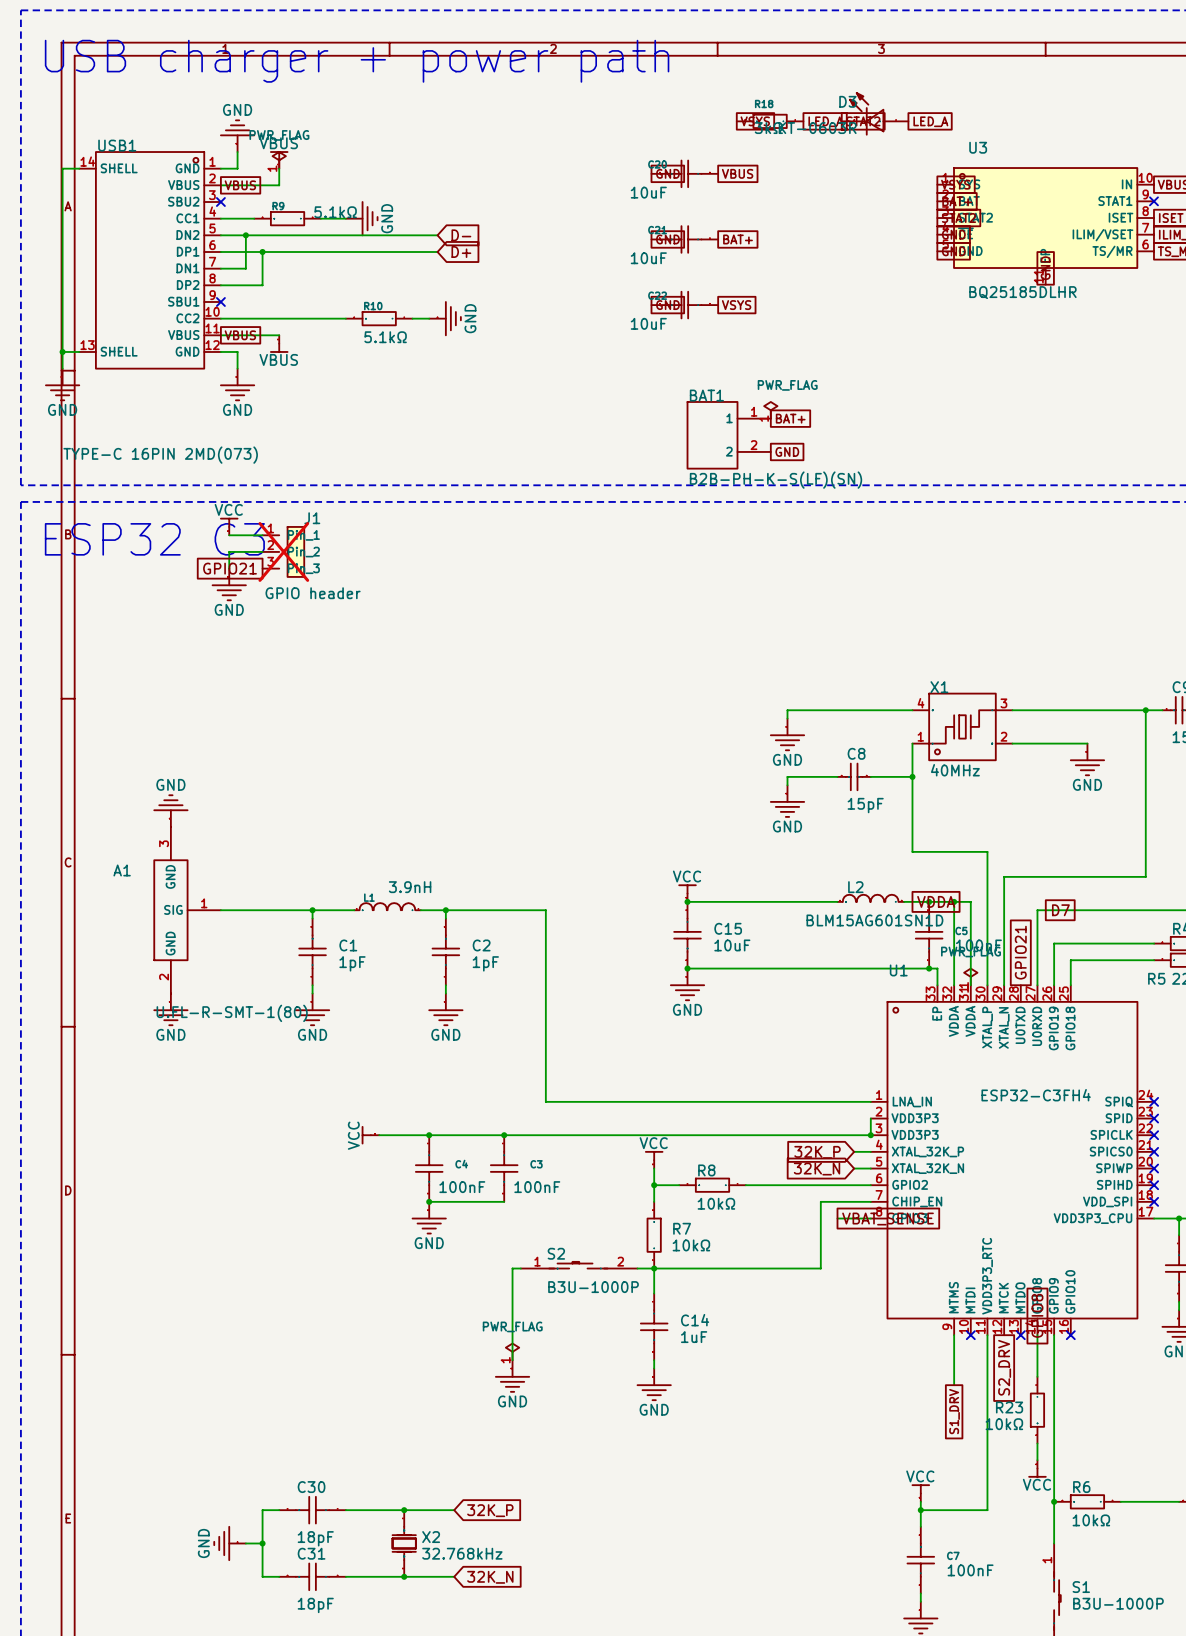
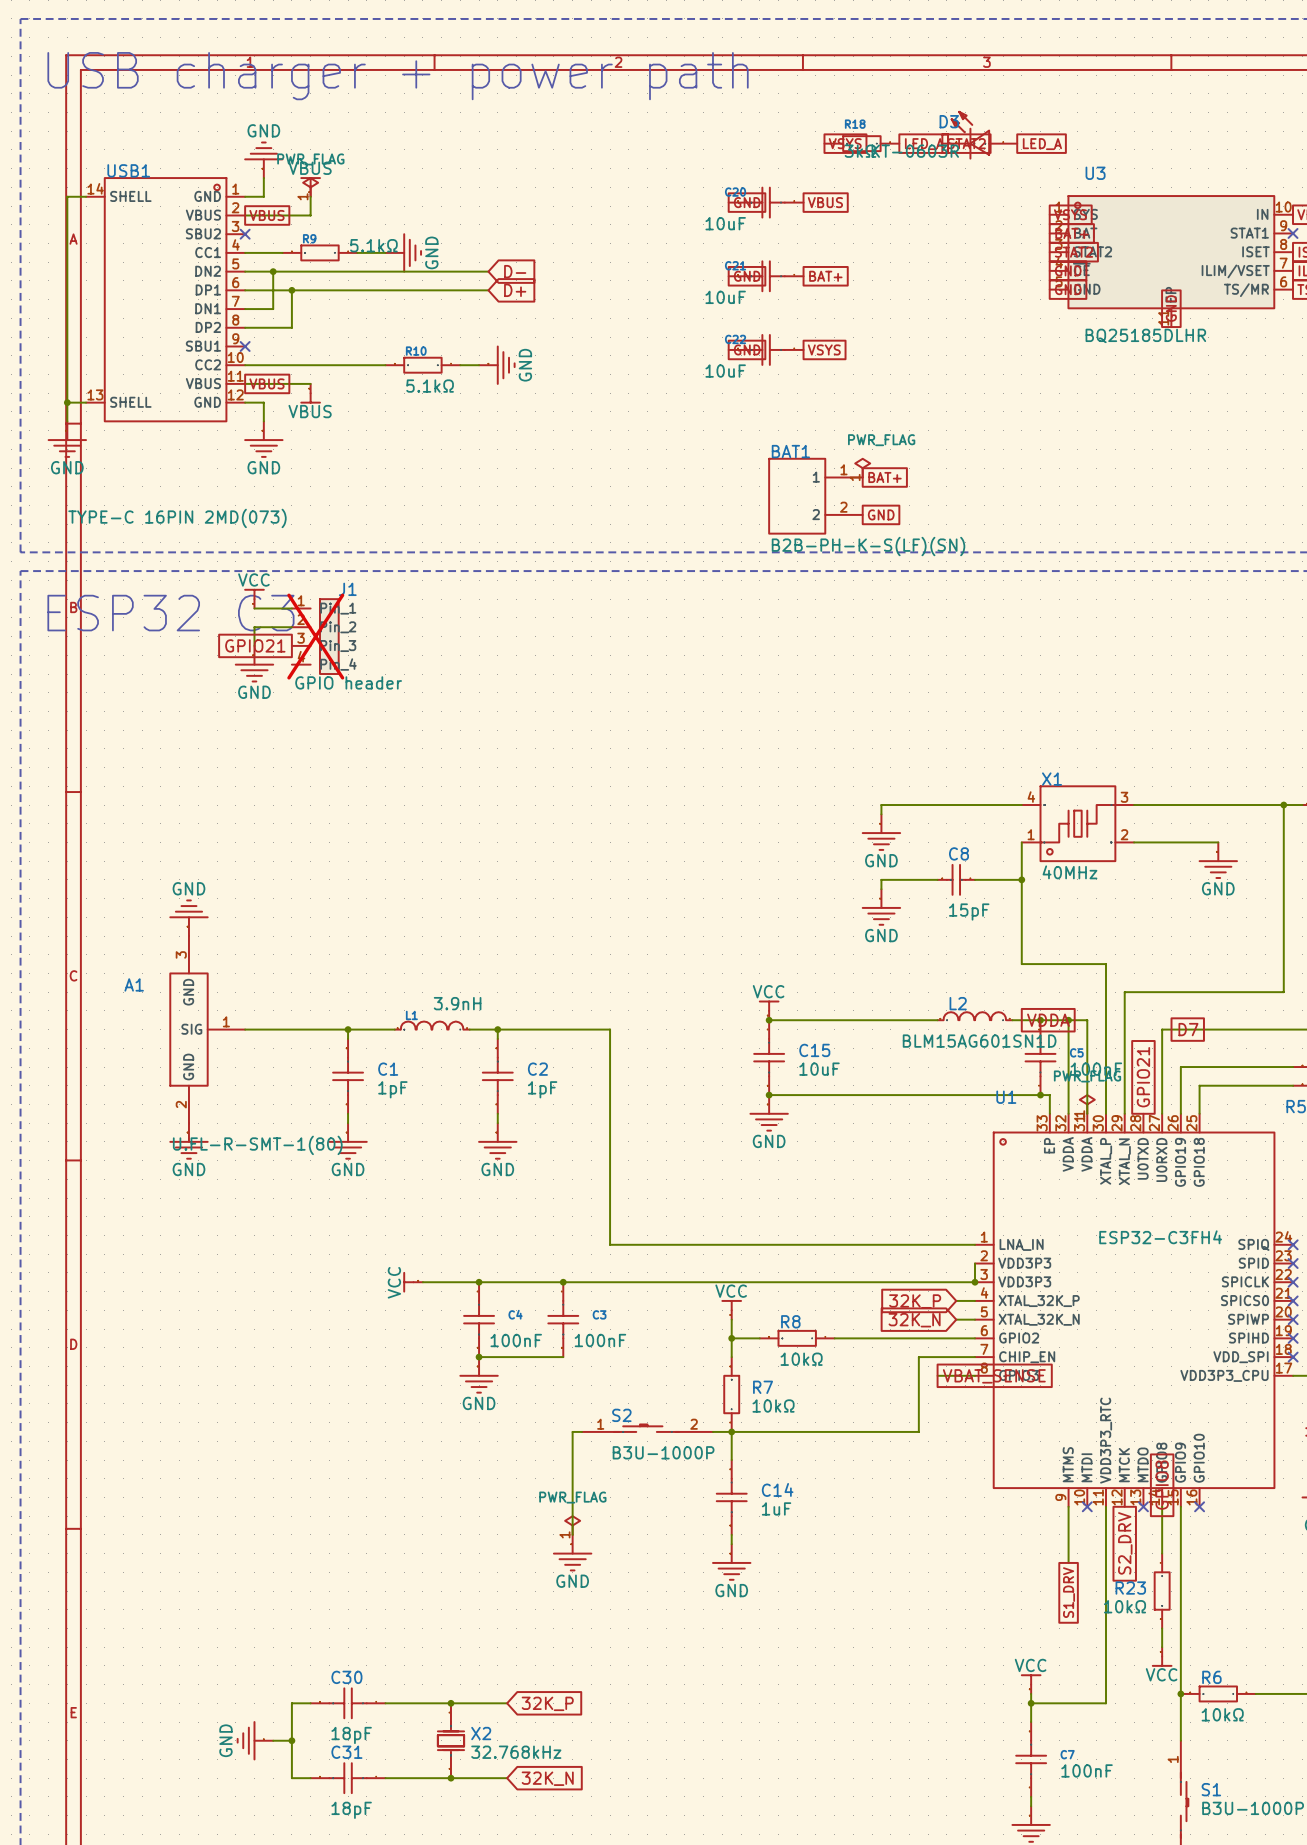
J1 symbol: [262, 526, 306, 578] -> [291, 598, 340, 675]

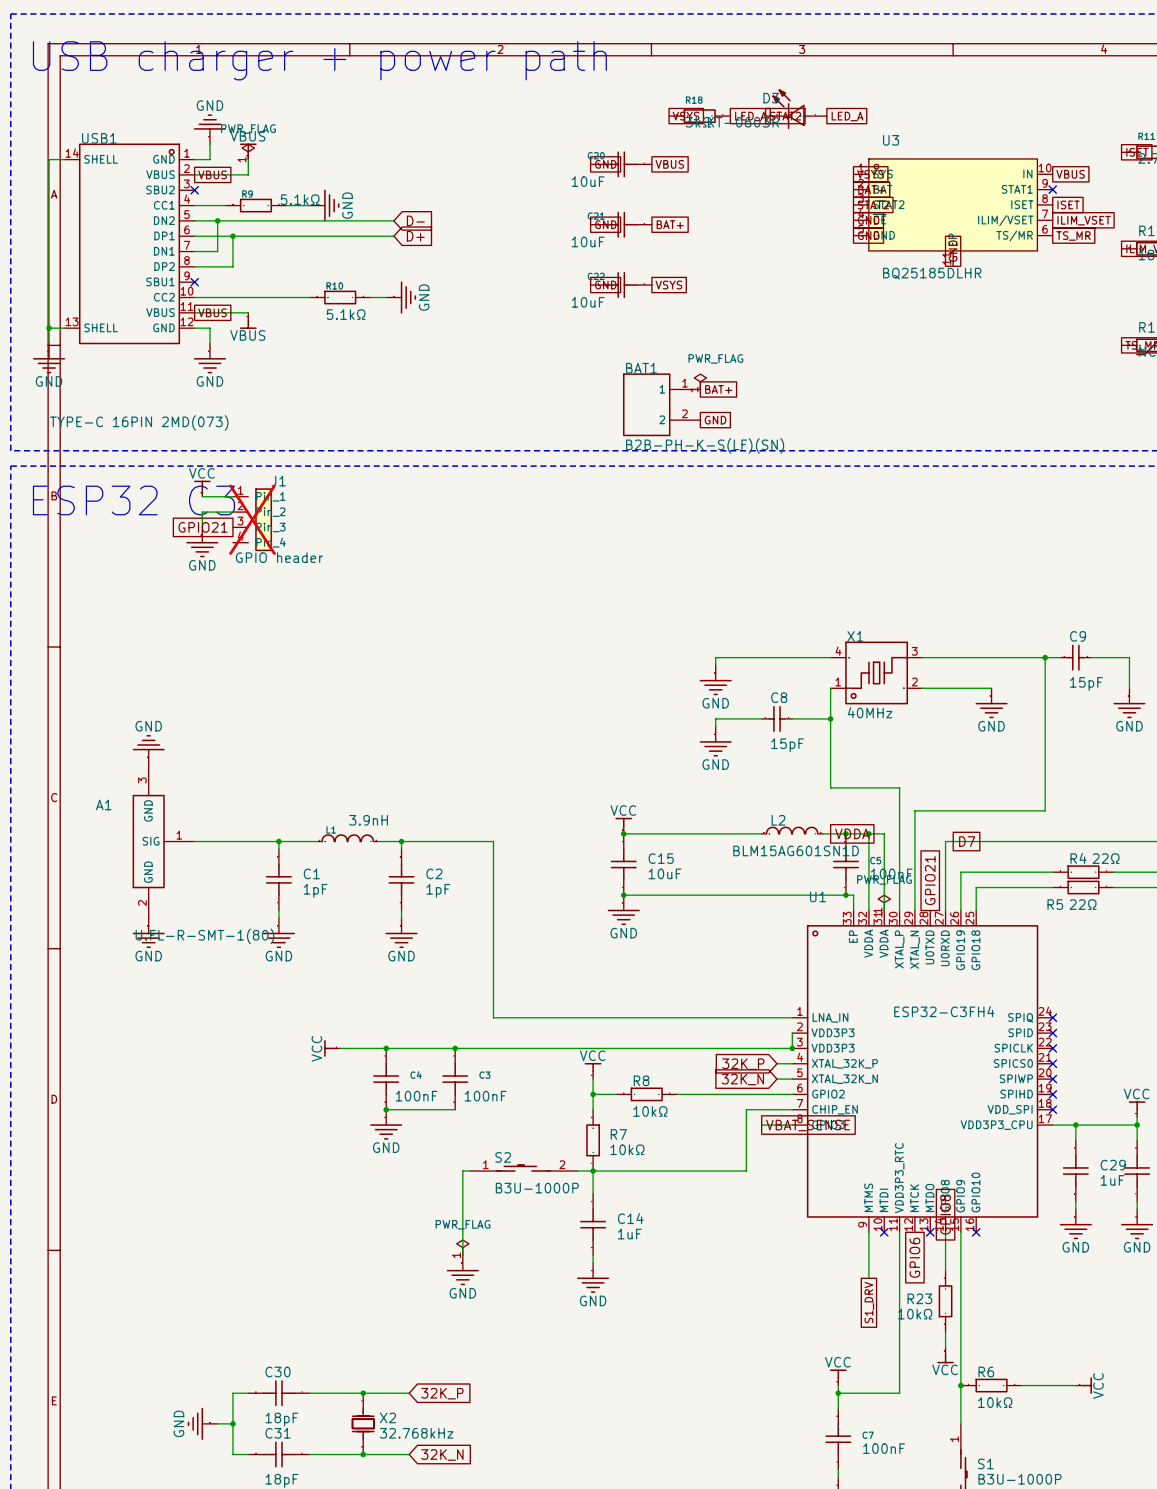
global label: S2_DRV (1125, 1543) -> GPIO6 (914, 1257)

